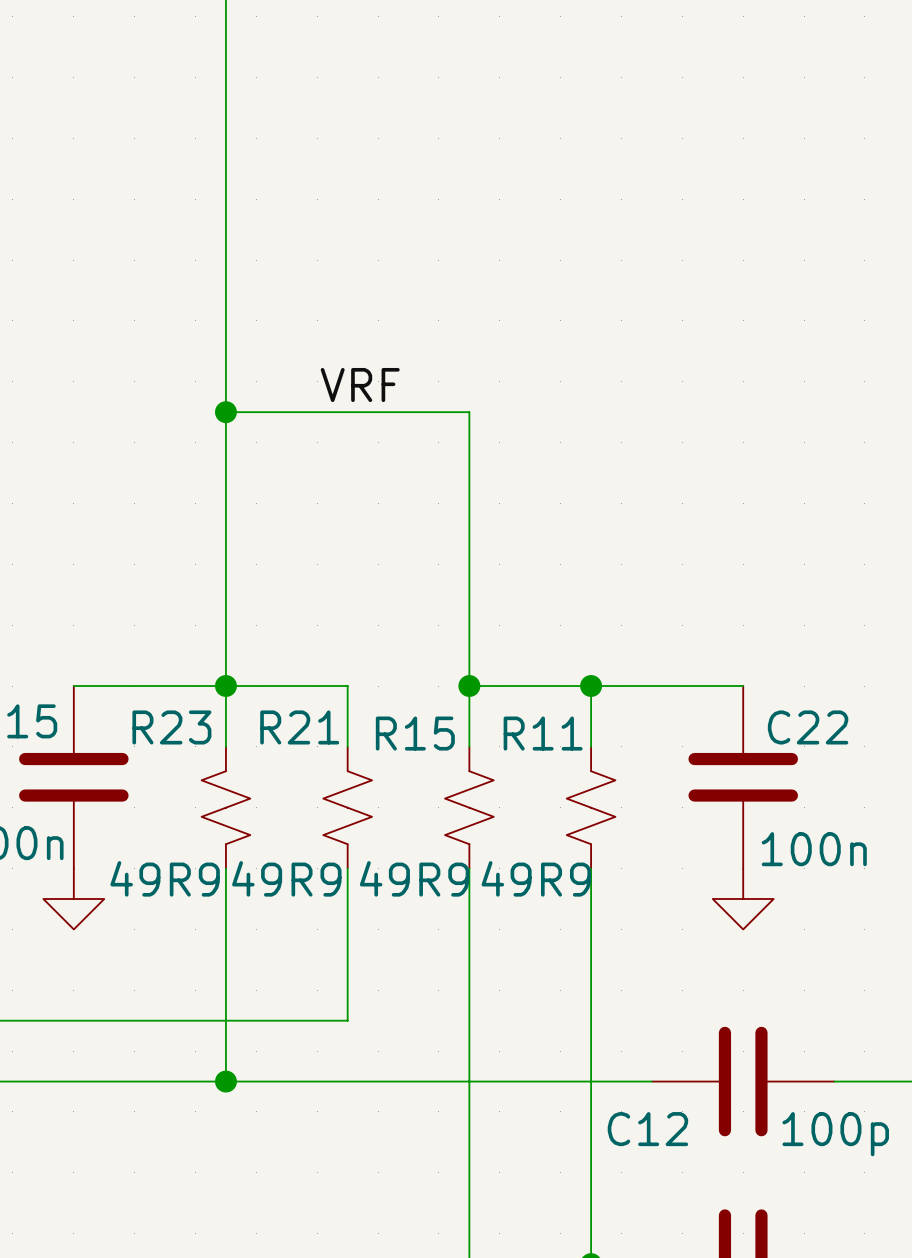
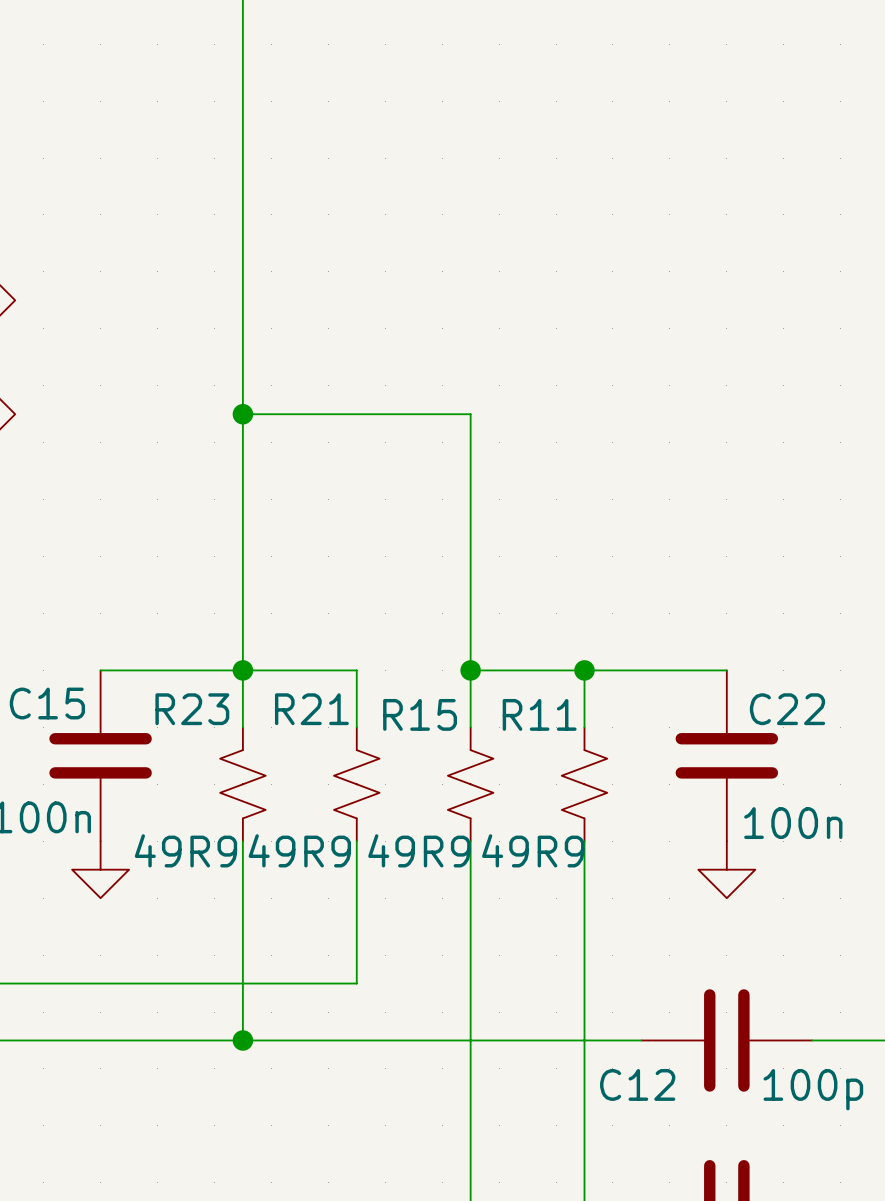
label: VRF (360, 385) -> none

